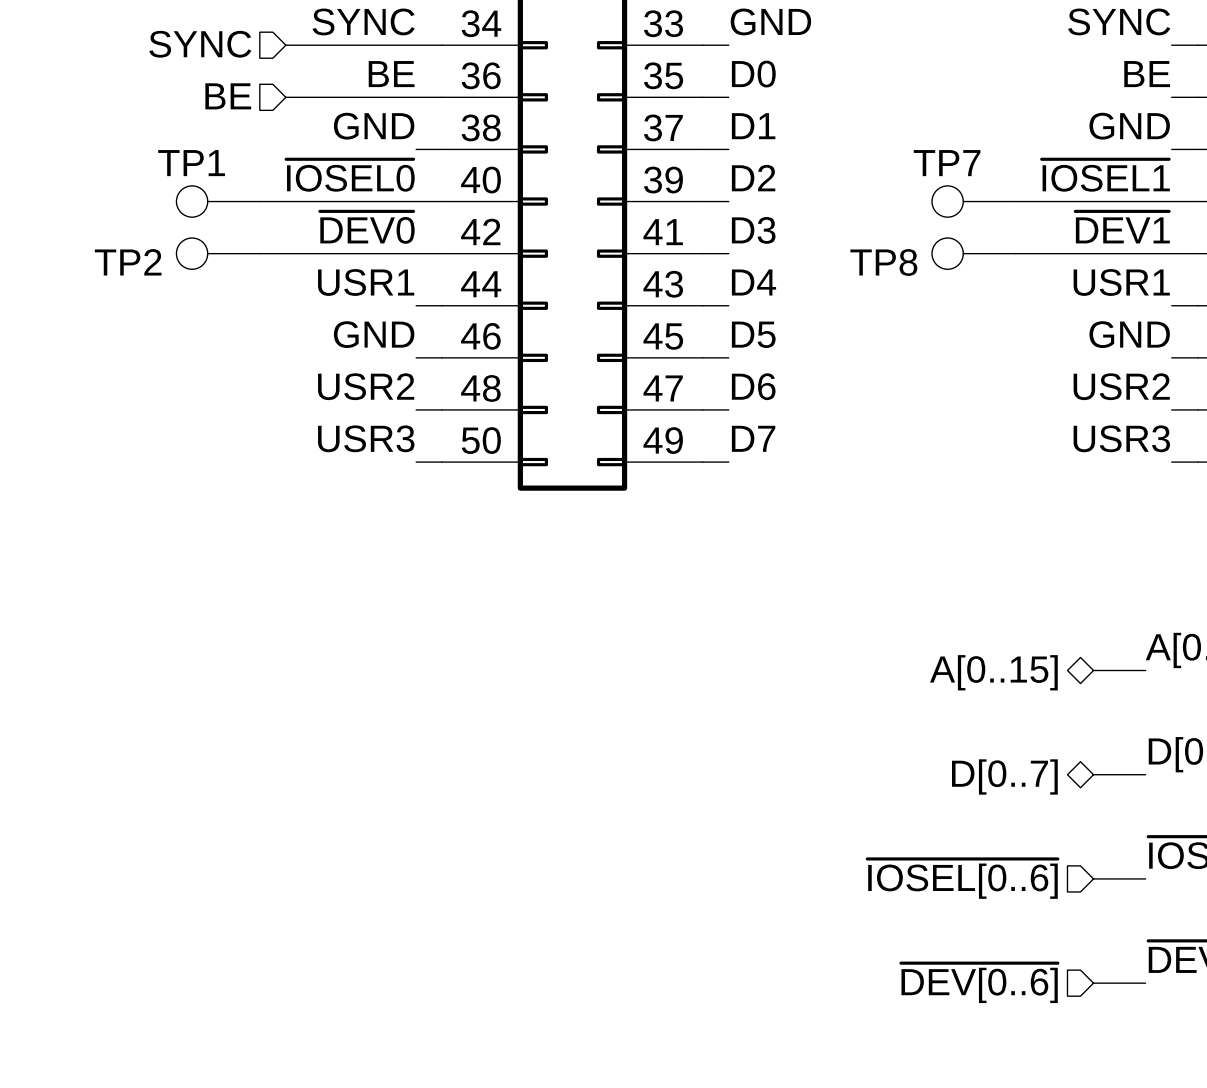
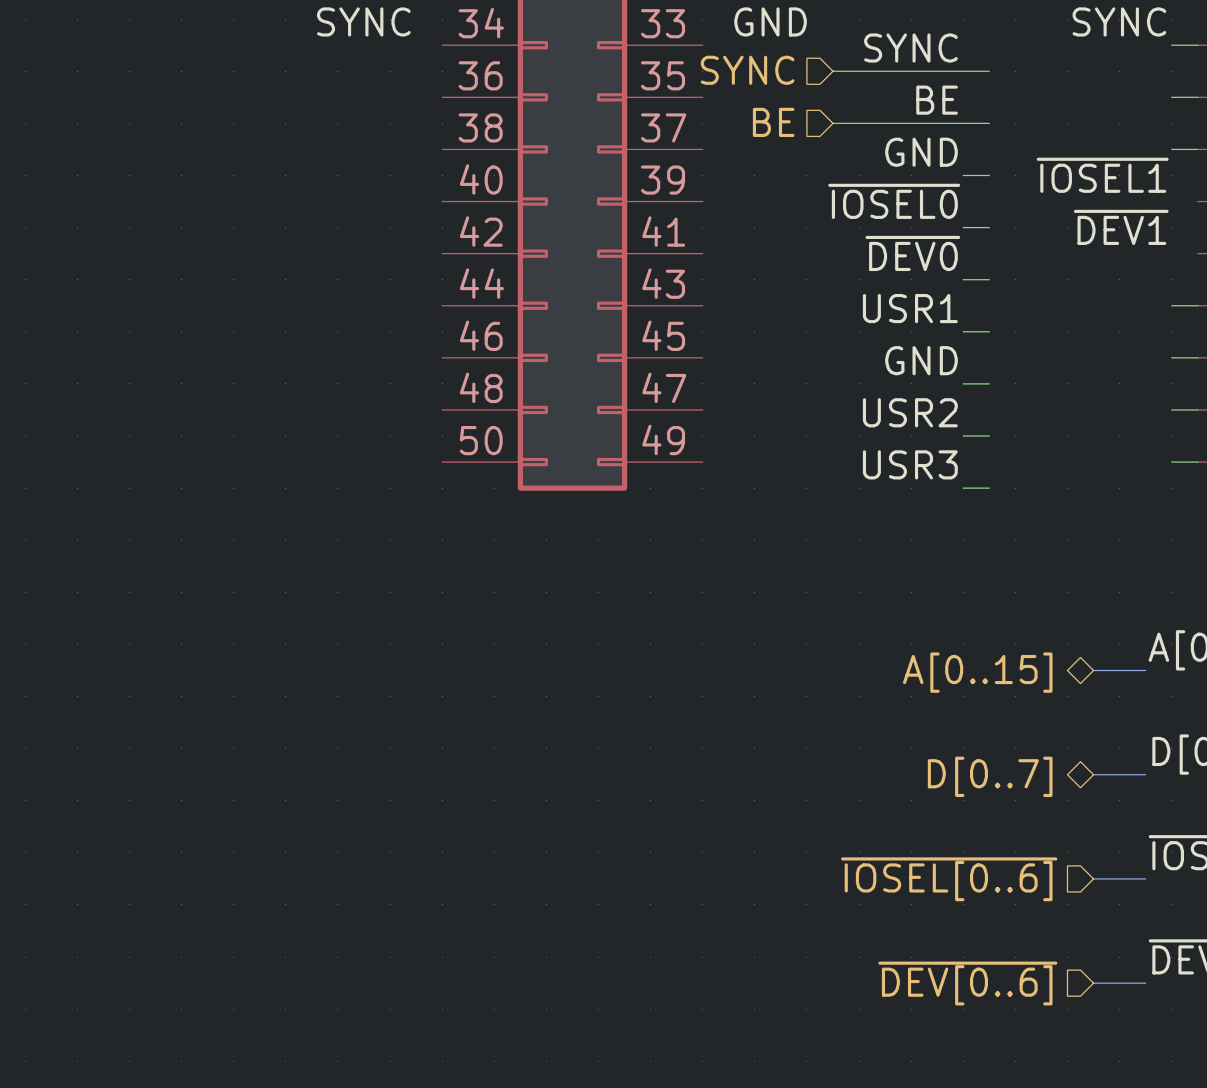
hierarchical label: SYNC (200, 44) -> none
wire: (285, 45) (442, 45) -> none
wire: (702, 45) (728, 45) -> none
label: none -> SYNC (910, 48)
hierarchical label: none -> SYNC (747, 70)
wire: none -> (833, 71) (989, 71)
label: BE (391, 74) -> none
label: D0 (753, 74) -> none
label: BE (1147, 74) -> none
hierarchical label: BE (228, 96) -> none
wire: (285, 97) (442, 97) -> none
wire: (702, 97) (728, 97) -> none
label: none -> BE (937, 100)
hierarchical label: none -> BE (773, 122)
wire: none -> (833, 123) (989, 123)
label: GND (374, 126) -> none
label: D1 (753, 126) -> none
label: GND (1129, 126) -> none
wire: (416, 149) (442, 149) -> none
wire: (702, 149) (728, 149) -> (963, 175) (989, 175)
label: none -> GND (921, 152)
label: ~{IOSEL0} (350, 175) -> none
label: D2 (753, 178) -> none
TP1: (218, 201) -> none
wire: (259, 201) (442, 201) -> none
wire: (702, 201) (728, 201) -> (963, 227) (989, 227)
label: none -> ~{IOSEL0} (894, 201)
TP7: (973, 201) -> none
wire: (1015, 201) (1197, 201) -> none
label: ~{DEV0} (367, 227) -> none
label: D3 (753, 230) -> none
TP2: (218, 253) -> none
wire: (259, 253) (442, 253) -> none
wire: (702, 253) (728, 253) -> (963, 279) (989, 279)
label: none -> ~{DEV0} (912, 253)
TP8: (973, 253) -> none
wire: (1015, 253) (1197, 253) -> none
label: USR1 (366, 282) -> none
label: D4 (753, 282) -> none
label: USR1 (1121, 282) -> none
wire: (416, 305) (442, 305) -> none
wire: (702, 305) (728, 305) -> (963, 331) (989, 331)
label: none -> USR1 (910, 308)
label: GND (374, 334) -> none
label: D5 (753, 334) -> none
label: GND (1129, 334) -> none
wire: (416, 357) (442, 357) -> none
wire: (702, 357) (728, 357) -> (963, 383) (989, 383)
label: none -> GND (921, 360)
label: USR2 (366, 386) -> none
label: D6 (753, 386) -> none
label: USR2 (1121, 386) -> none
wire: (416, 409) (442, 409) -> none
wire: (702, 409) (728, 409) -> (963, 436) (989, 436)
label: none -> USR2 (910, 412)
label: USR3 (366, 438) -> none
label: D7 (753, 438) -> none
label: USR3 (1121, 438) -> none
wire: (416, 462) (442, 462) -> none
wire: (702, 462) (728, 462) -> (963, 488) (989, 488)
label: none -> USR3 (910, 464)

